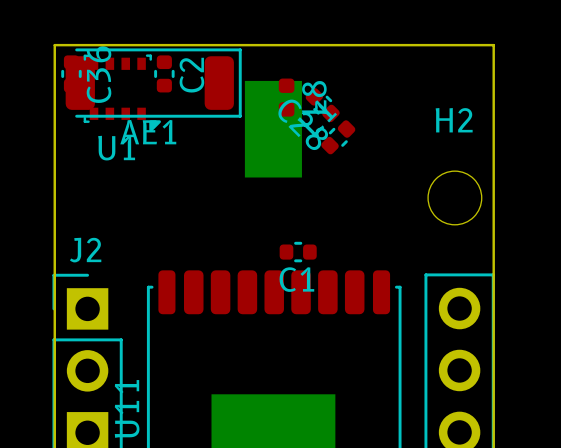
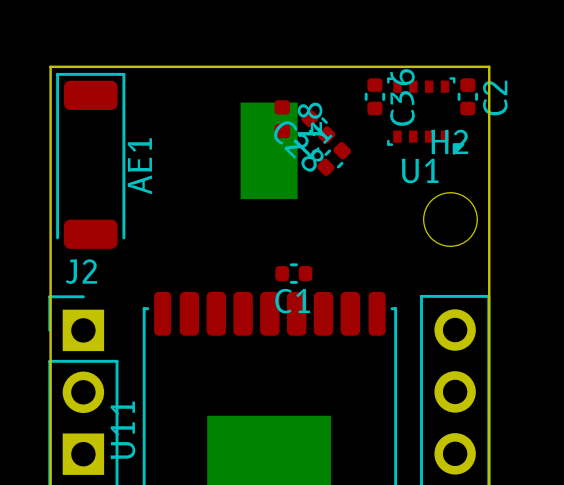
C36 position: (71, 73) -> (374, 96)
C2 position: (164, 73) -> (467, 96)
AE1 rotation: 0° (153, 83) -> 90° counterclockwise (90, 160)
U1 position: (122, 93) -> (425, 116)

